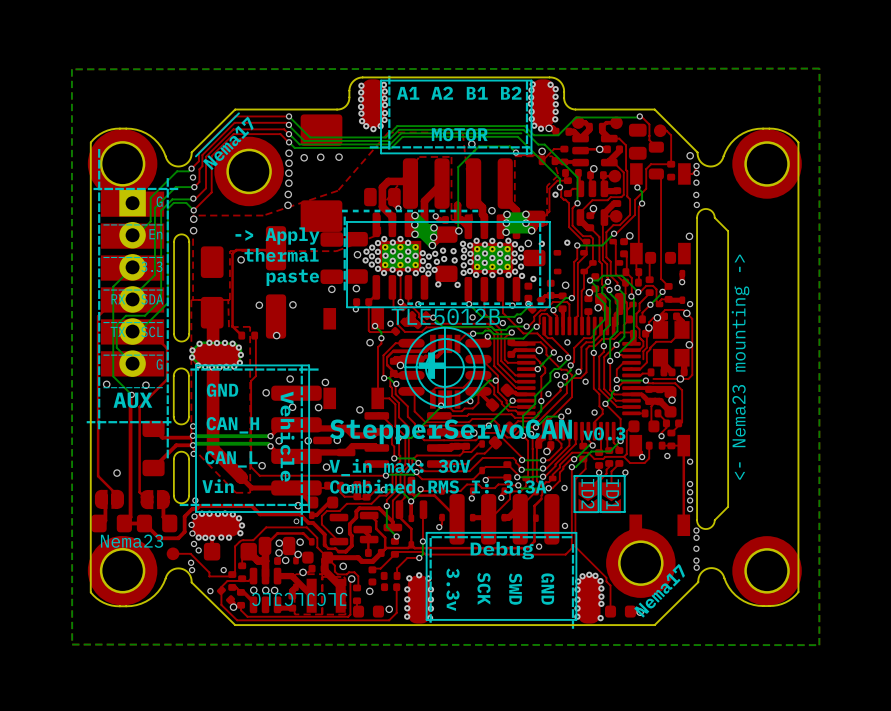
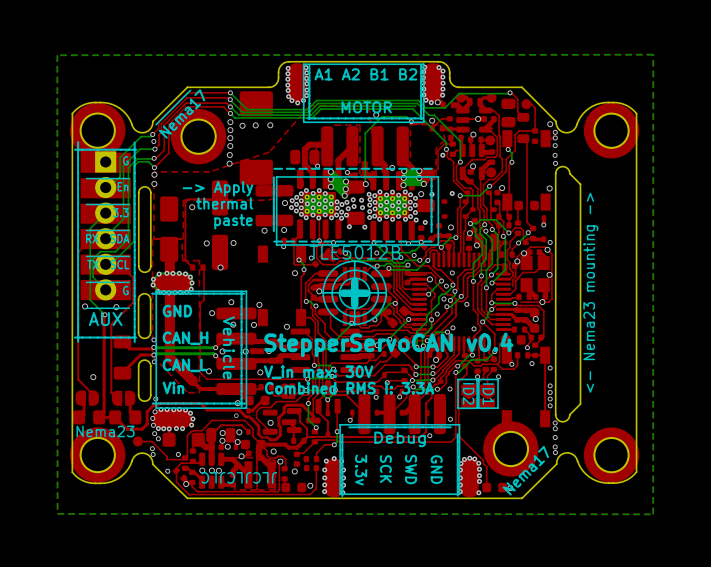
top track: (655, 401) (651, 406) (651, 424) -> none
text: StepperServoCAN (450, 431) -> StepperServoCAN v0.4 (388, 344)
text: v0.3 (604, 433) -> none

